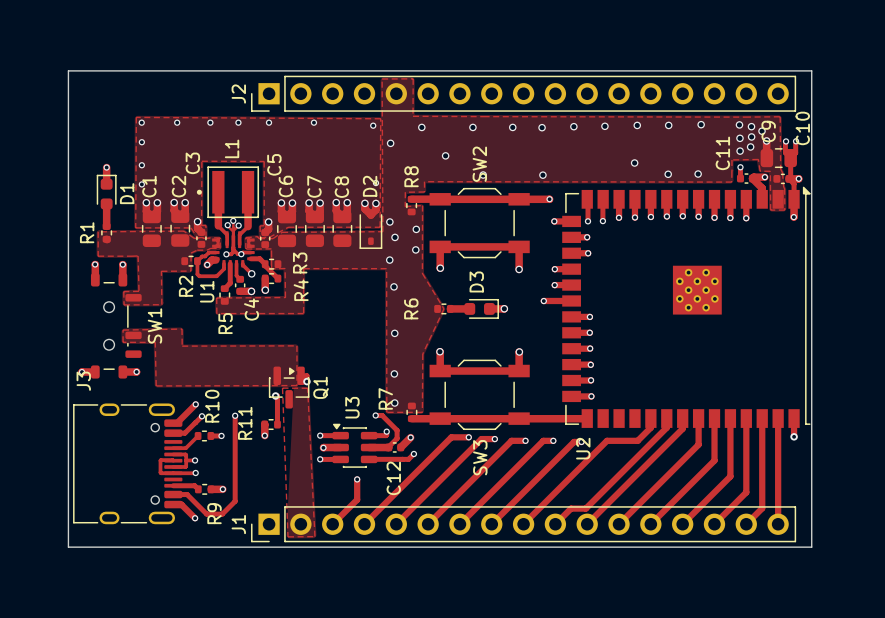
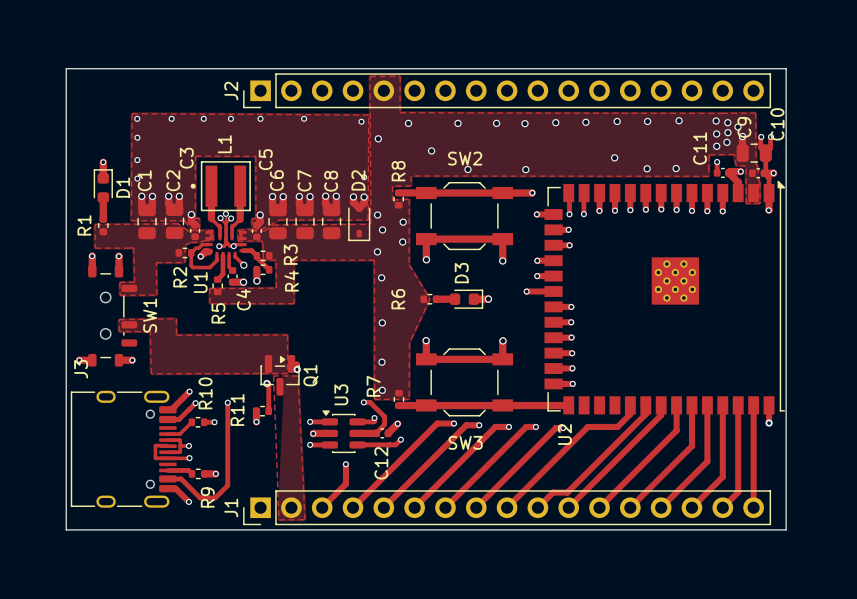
SW2 name rotation: 0° (479, 164) -> 90° clockwise (465, 158)
SW3 name rotation: 0° (480, 457) -> 90° clockwise (465, 442)

